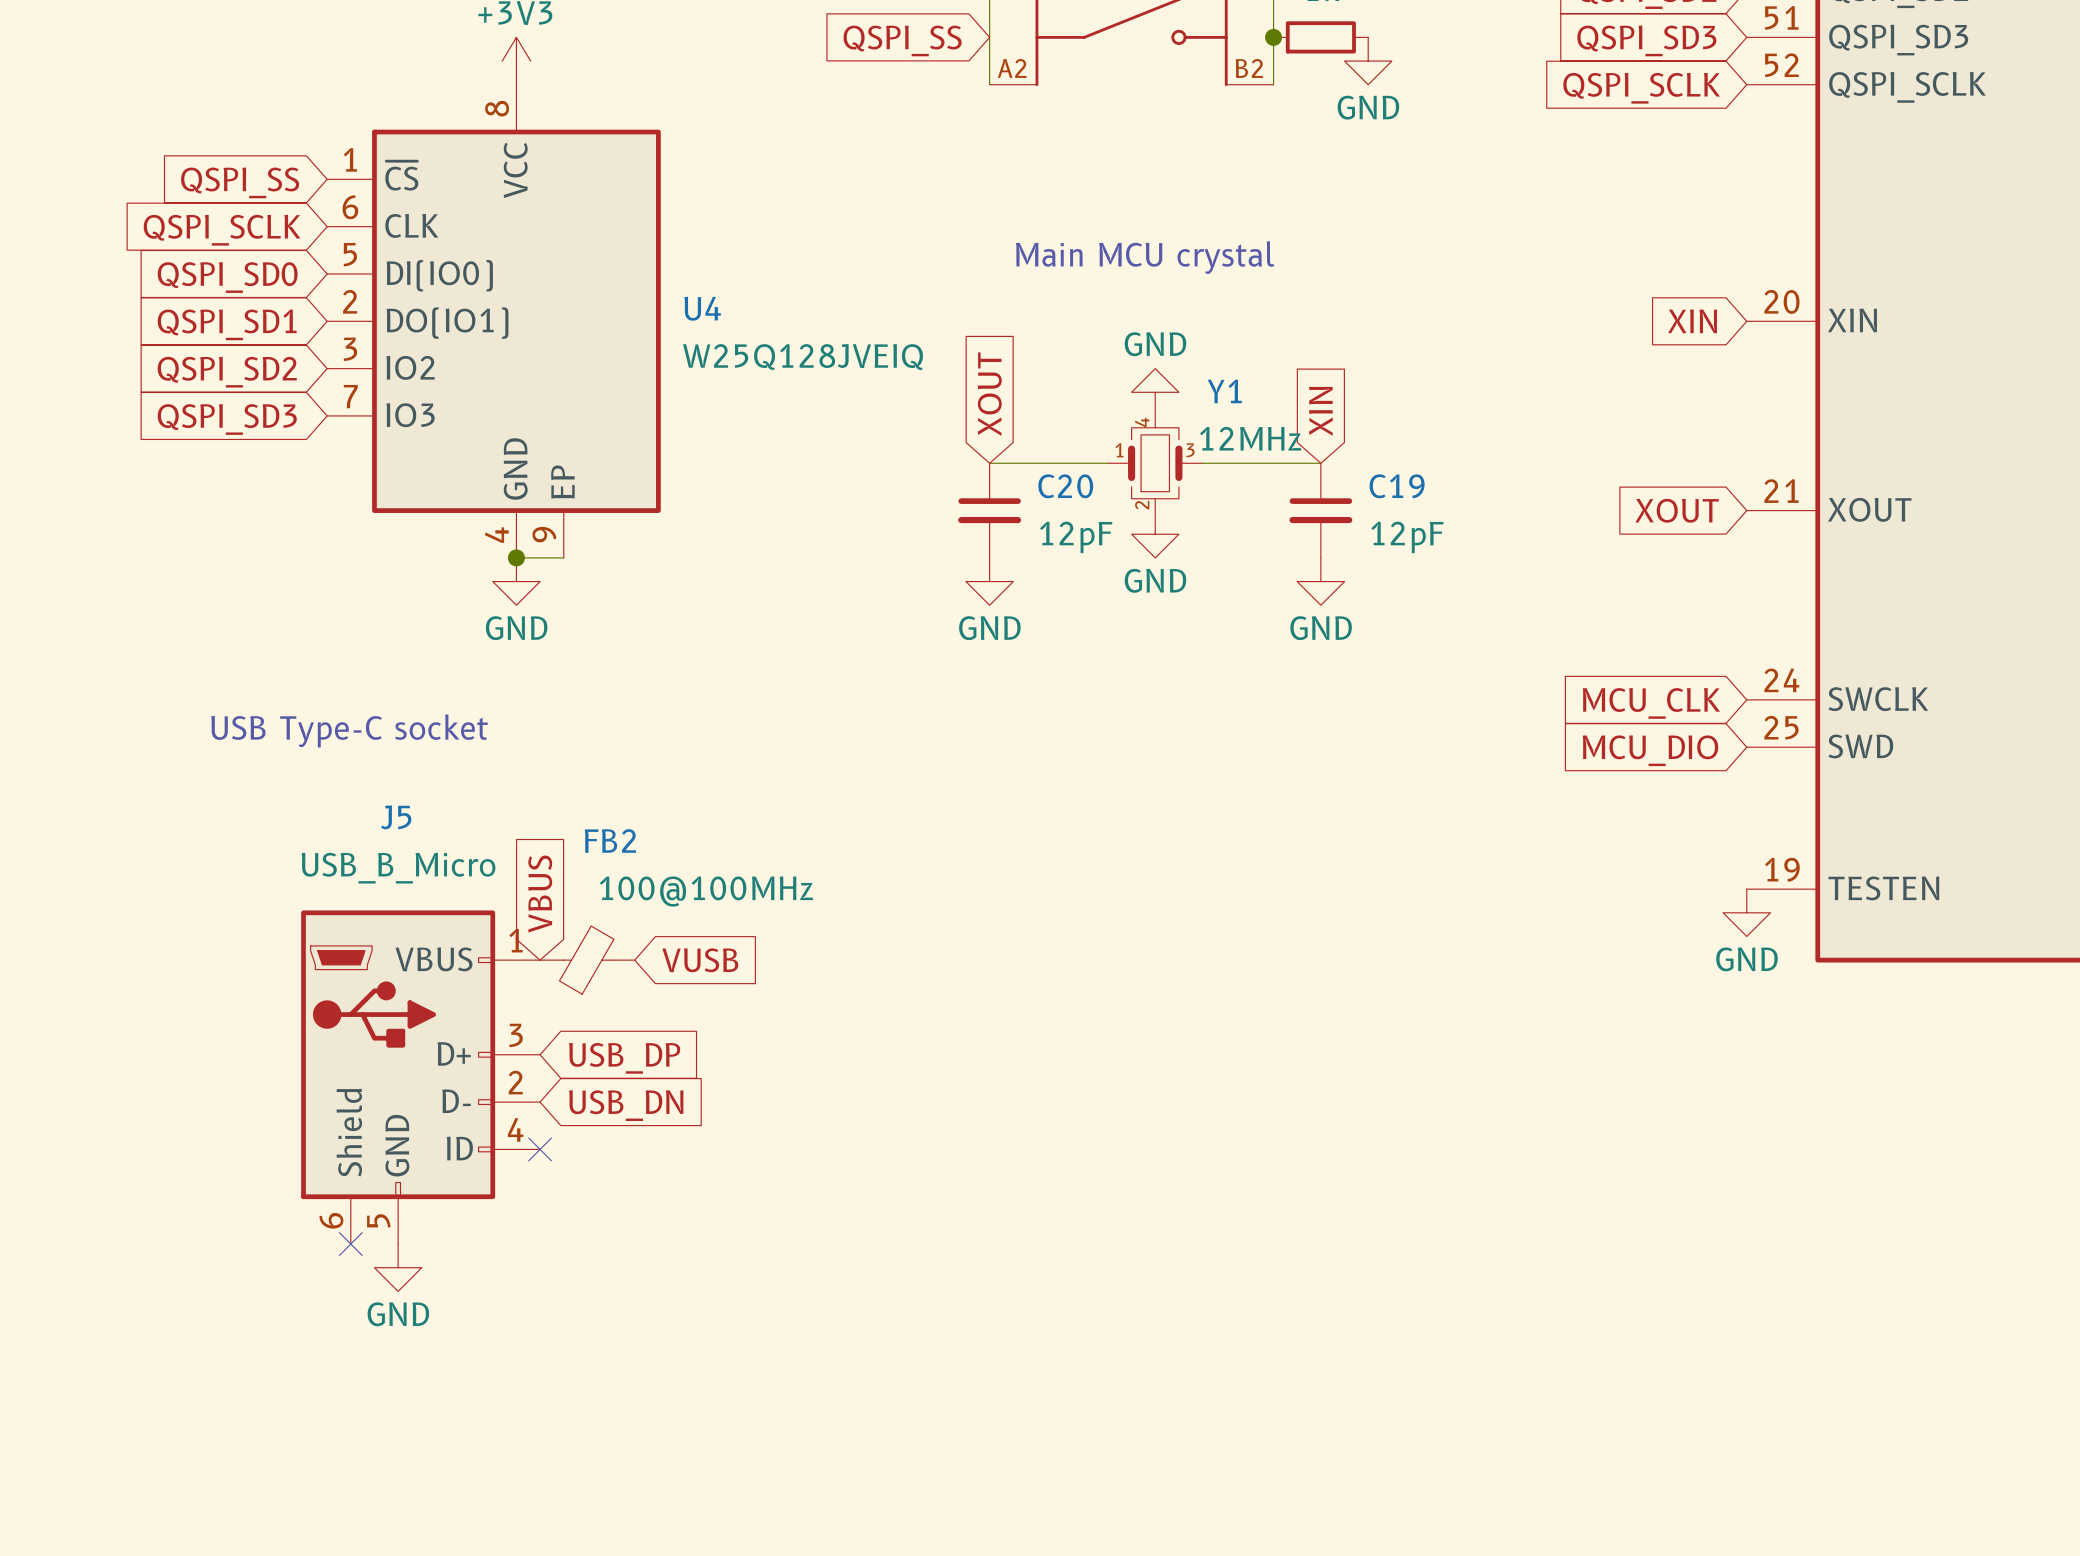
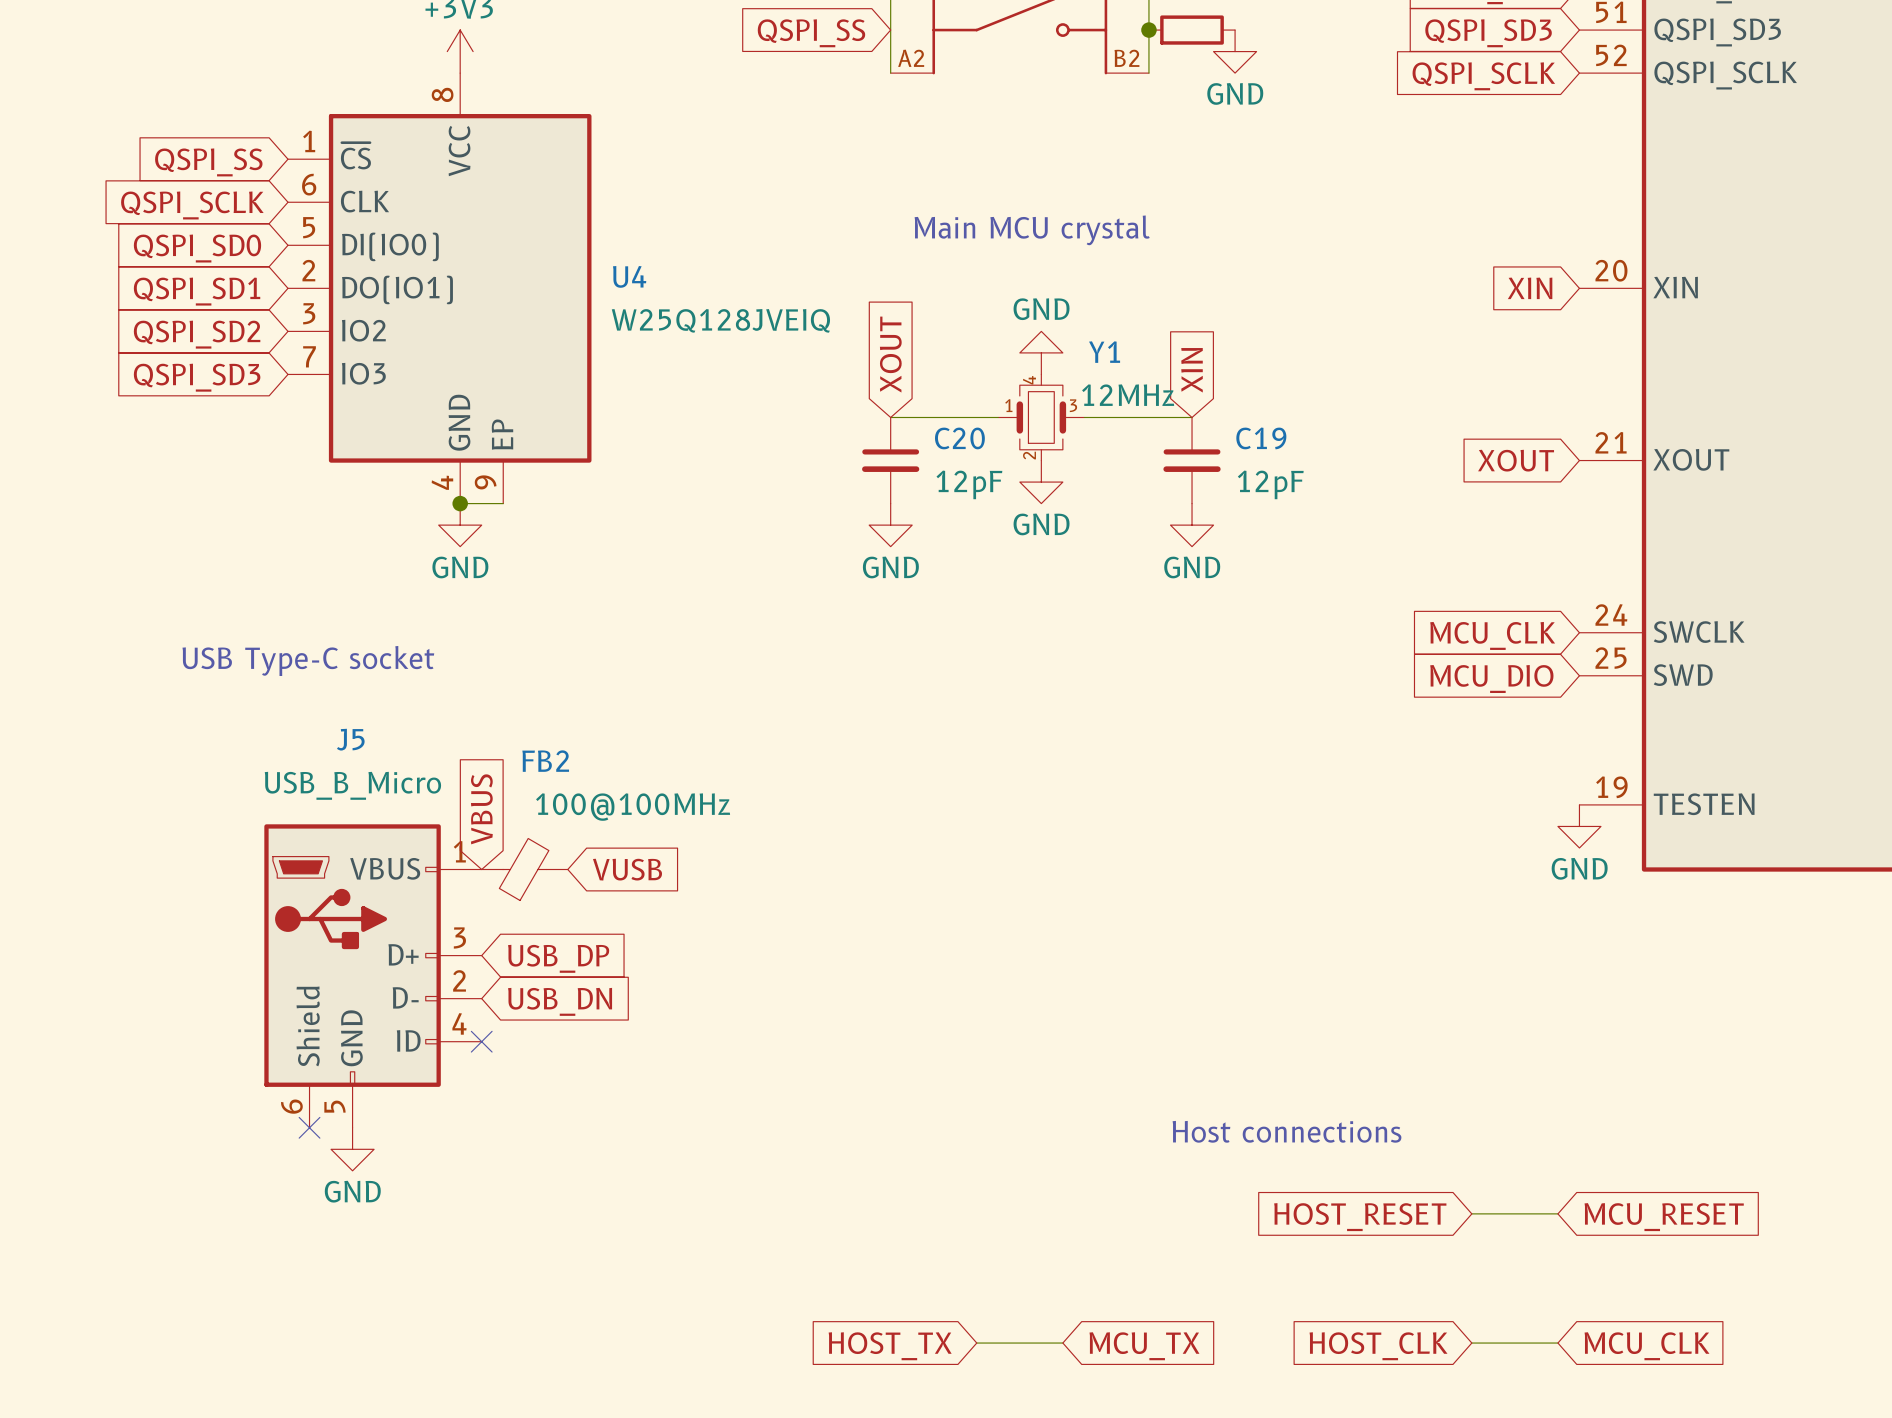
text: none -> Host connections (1287, 1131)
wire: none -> (1471, 1213) (1557, 1213)
global label: none -> HOST_RESET (1360, 1217)
global label: none -> MCU_RESET (1664, 1217)
wire: none -> (976, 1343) (1062, 1343)
wire: none -> (1471, 1343) (1557, 1343)
global label: none -> HOST_TX (890, 1346)
global label: none -> MCU_TX (1144, 1346)
global label: none -> HOST_CLK (1378, 1346)
global label: none -> MCU_CLK (1647, 1346)

